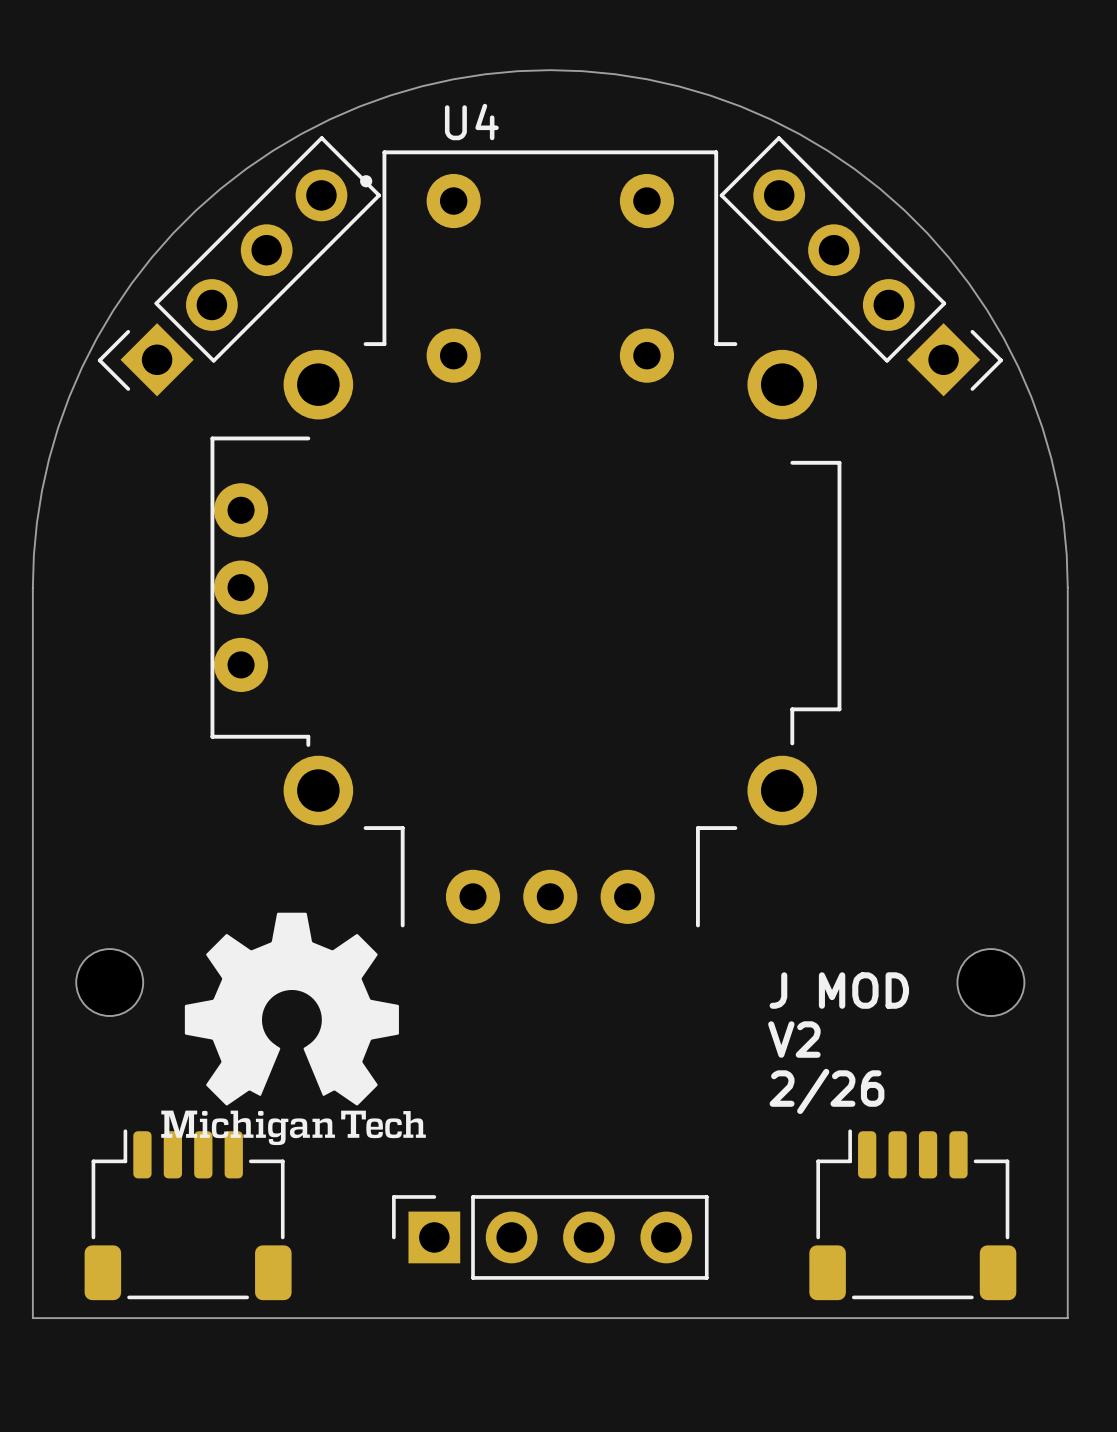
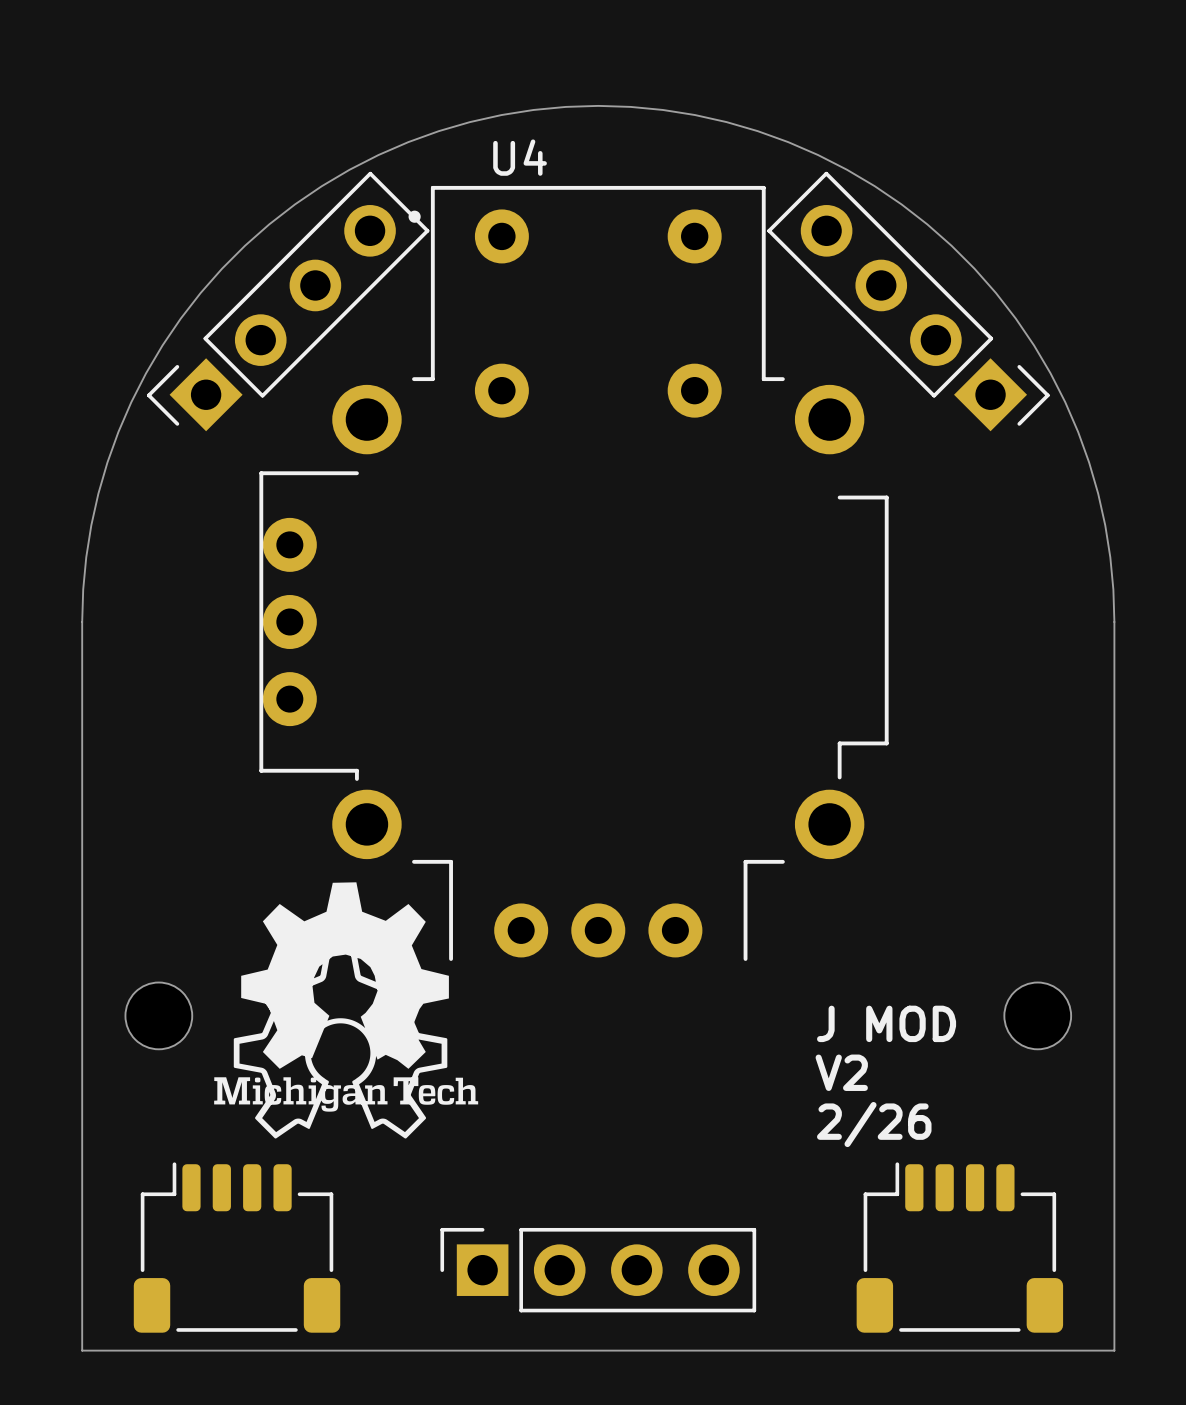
drawing position: (292, 1008) -> (345, 975)
drawing: none -> [252, 1077, 263, 1105]
drawing: none -> [308, 1077, 319, 1105]
drawing: [199, 1110, 210, 1138] -> none
drawing: [255, 1110, 266, 1138] -> none
drawing position: (179, 1124) -> (232, 1090)
drawing position: (242, 1124) -> (294, 1090)
drawing position: (353, 1124) -> (406, 1090)
drawing position: (414, 1124) -> (466, 1091)
drawing position: (220, 1128) -> (272, 1094)
drawing position: (299, 1128) -> (352, 1094)
drawing position: (323, 1128) -> (376, 1094)
drawing position: (374, 1128) -> (427, 1094)
drawing position: (393, 1128) -> (445, 1094)
drawing position: (278, 1131) -> (330, 1098)

